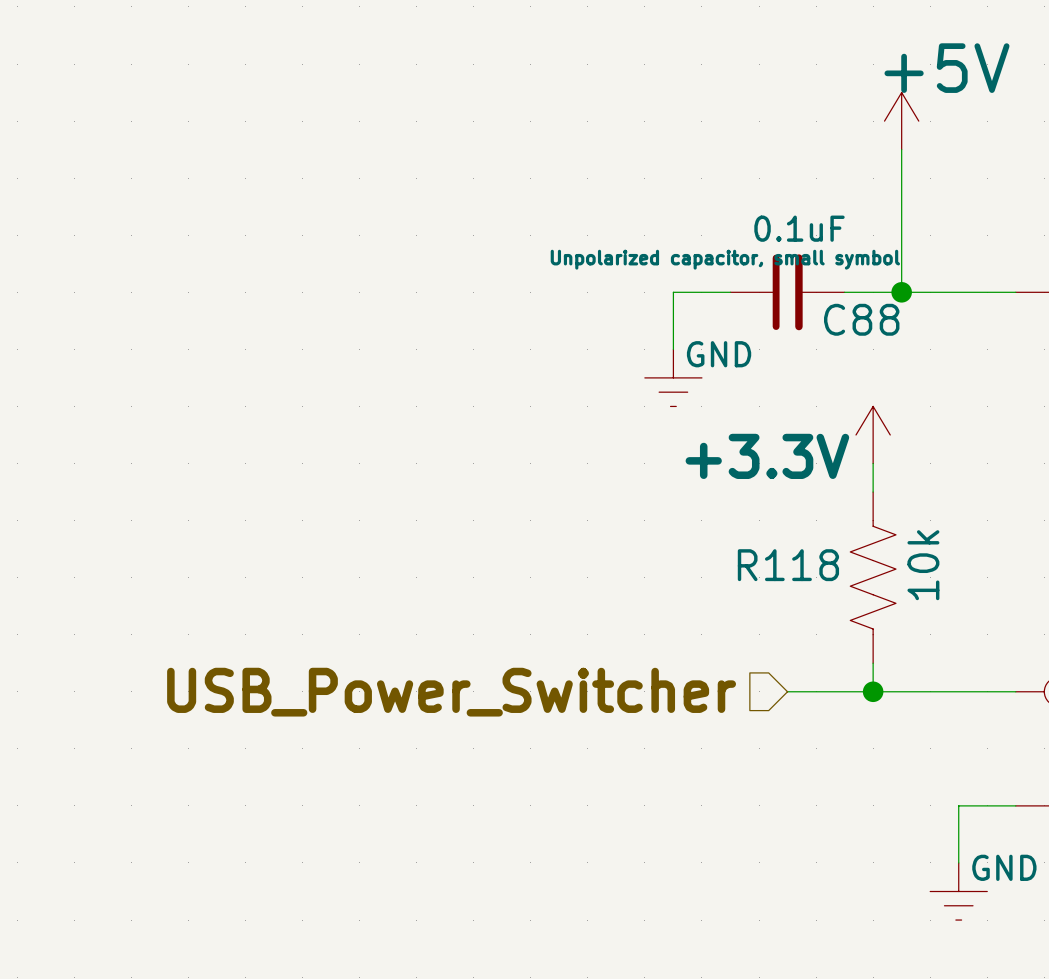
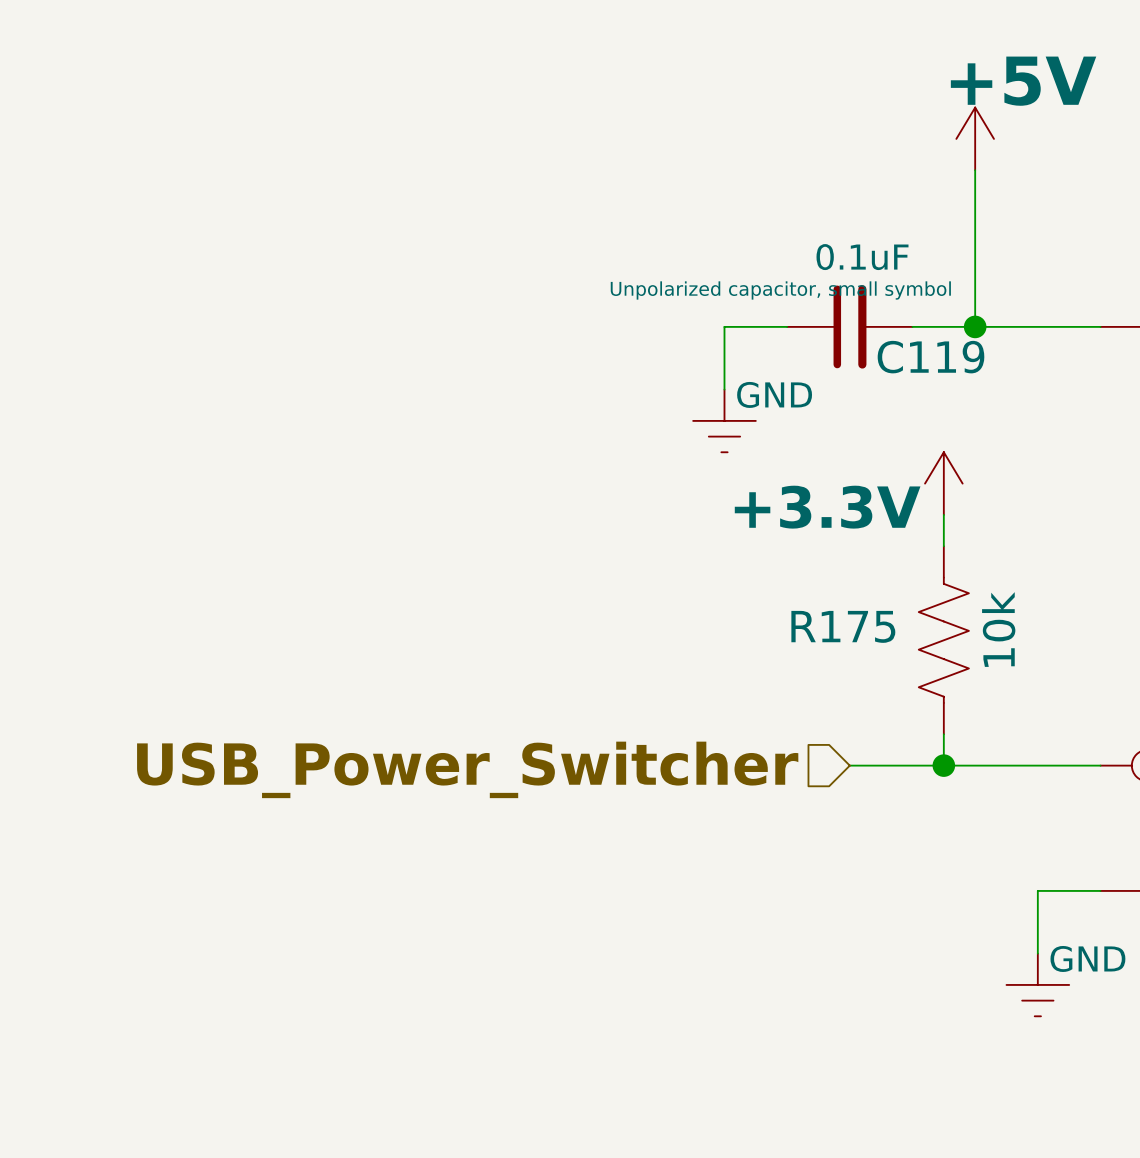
C88 name: C88 (861, 319) -> C119 (931, 357)
R118 name: R118 (788, 565) -> R175 (843, 626)

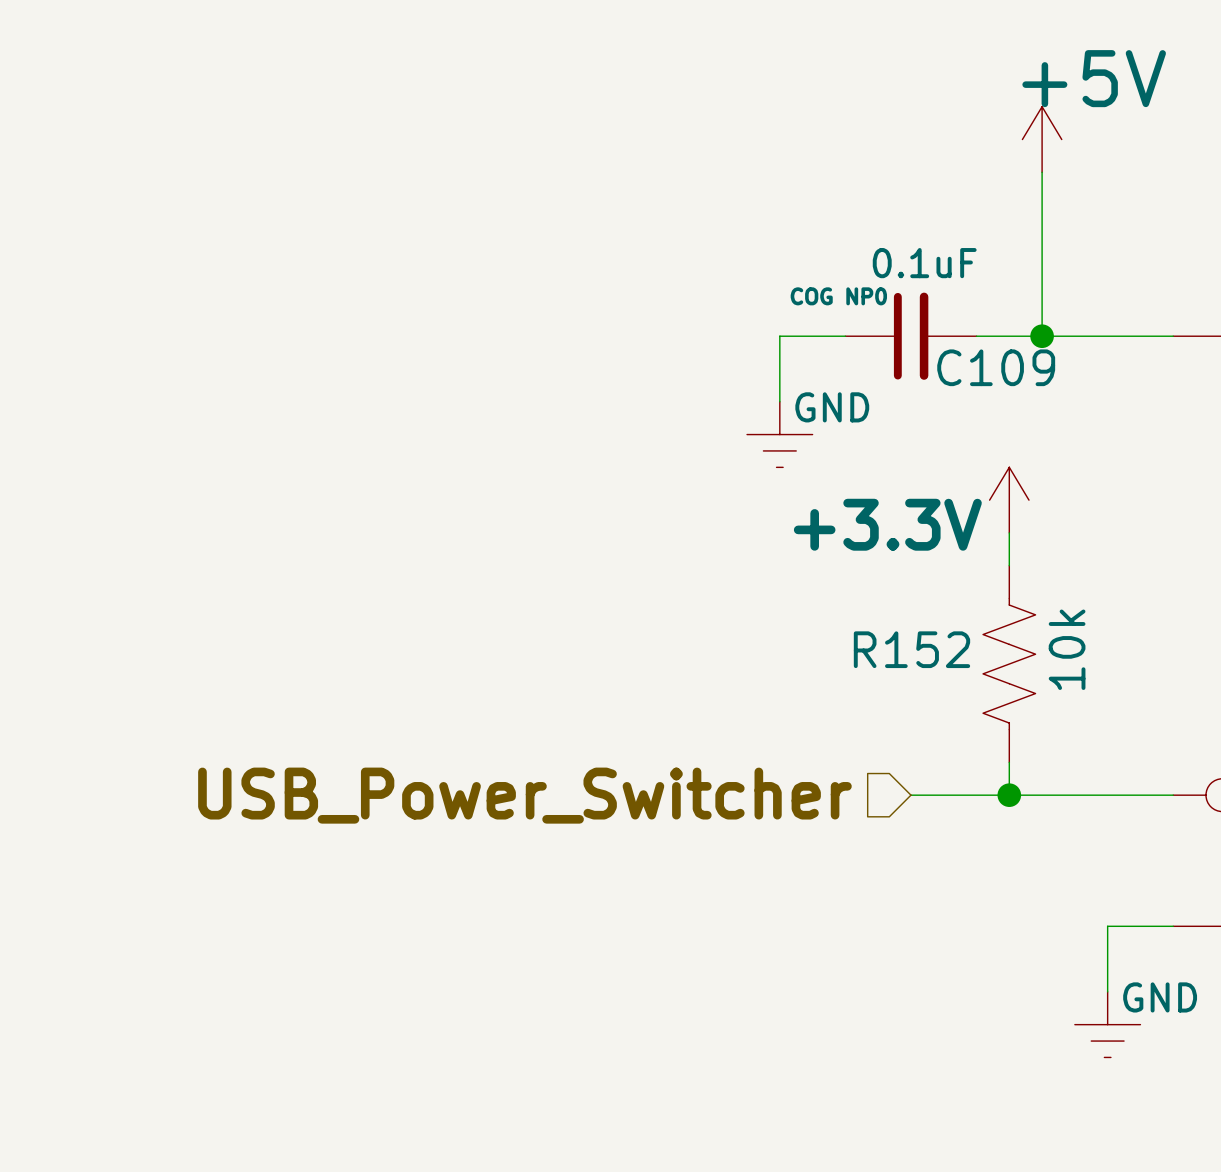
C119 text: Unpolarized capacitor, small symbol (780, 290) -> COG NP0 (838, 296)
C119 name: C119 (931, 357) -> C109 (996, 367)
R175 name: R175 (843, 626) -> R152 (911, 649)

